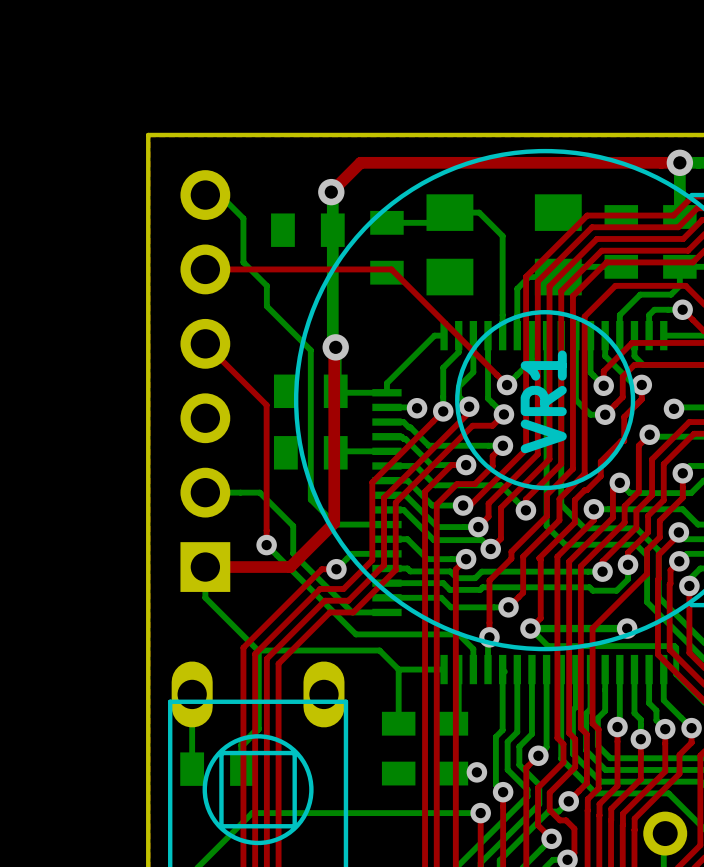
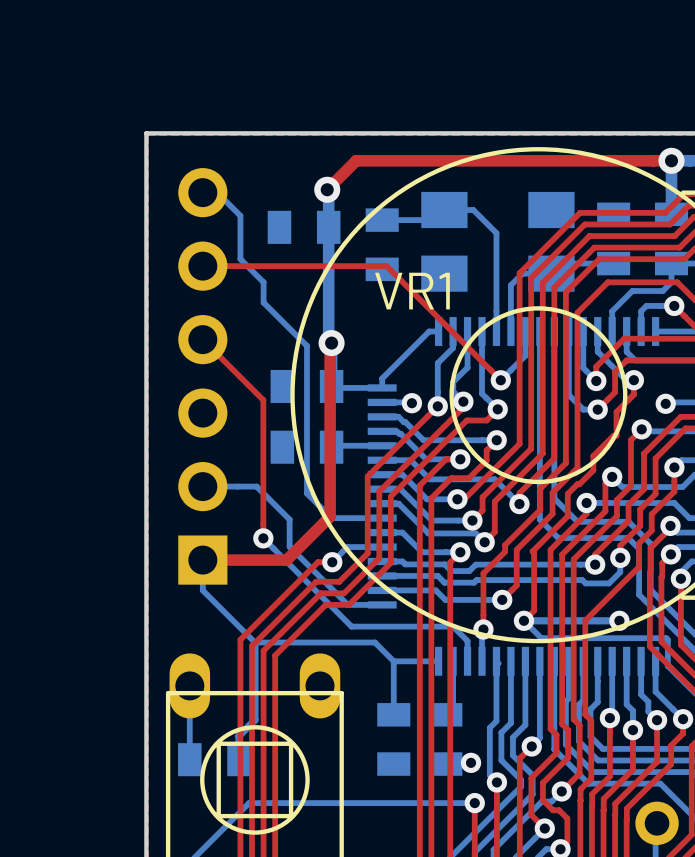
VR1 name rotation: 0° (543, 401) -> 90° clockwise (412, 291)
VR1 name position: VR1 (543, 401) -> VR1 (412, 291)

